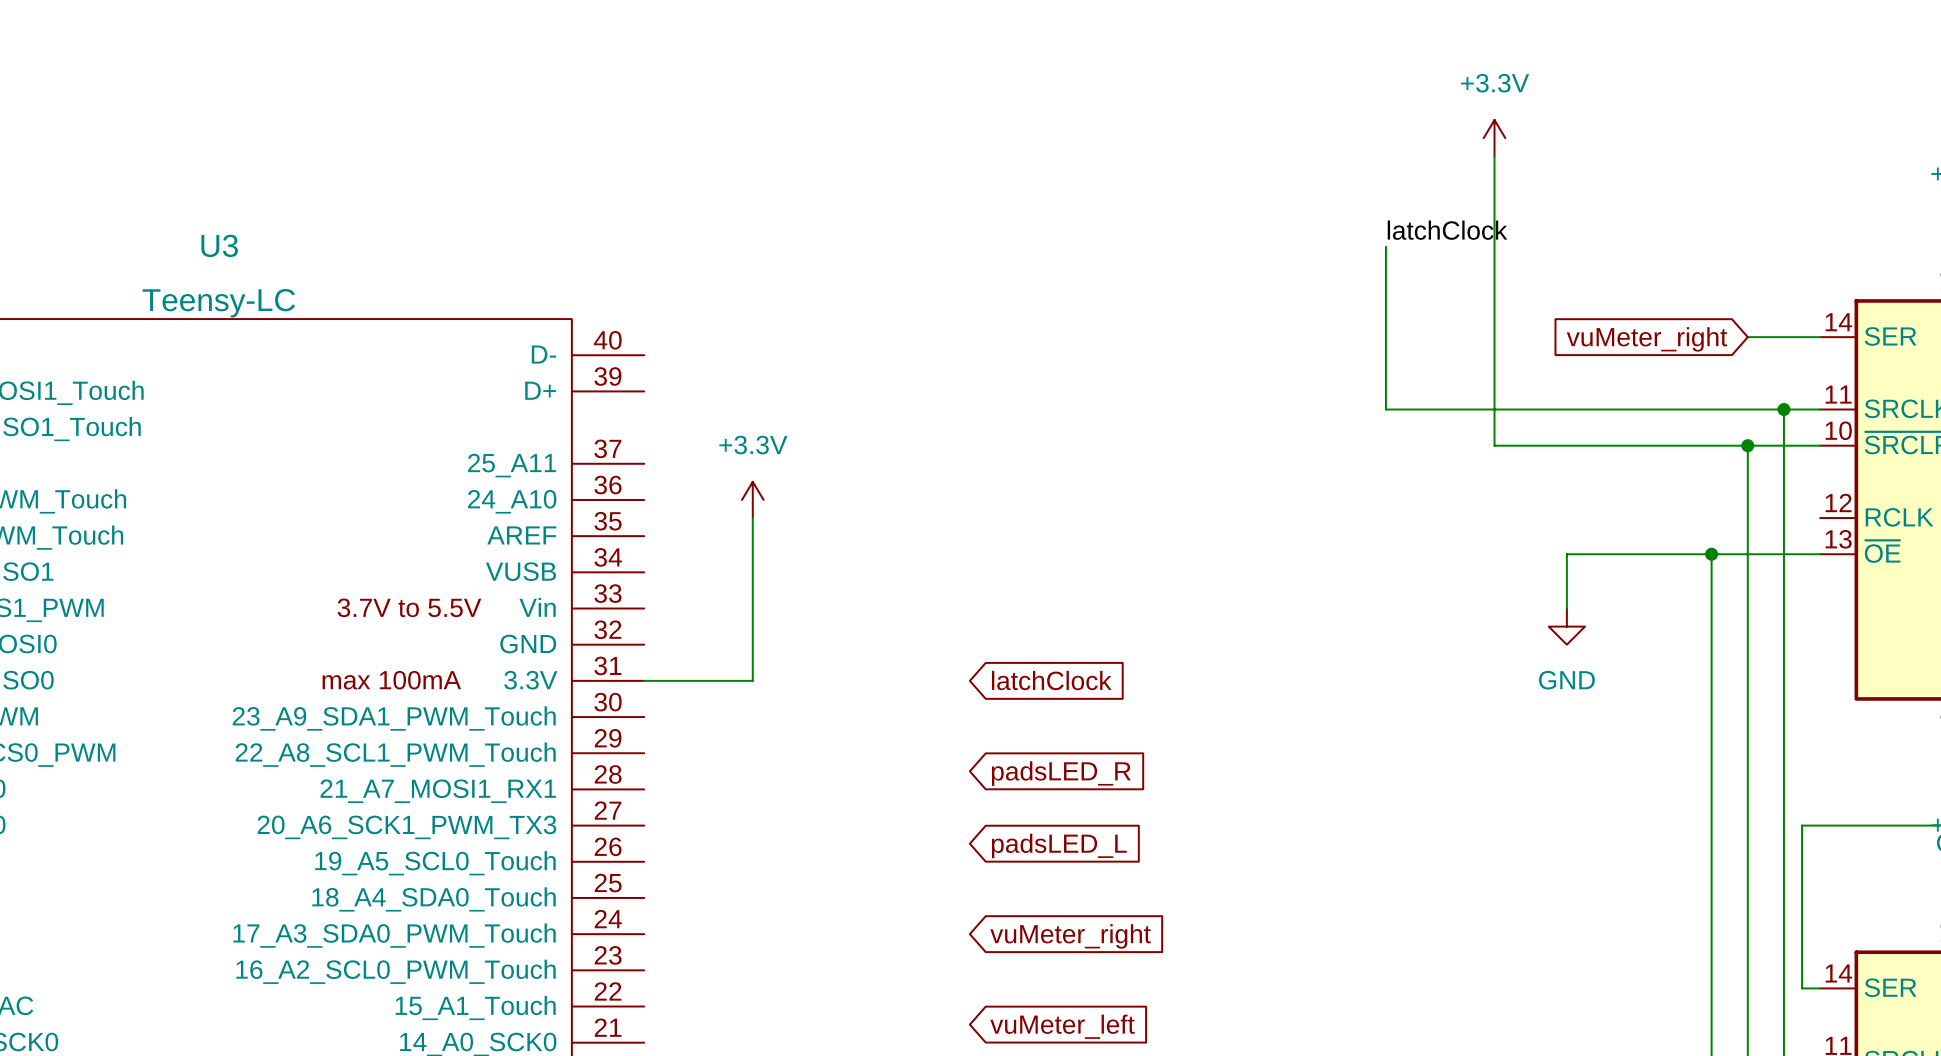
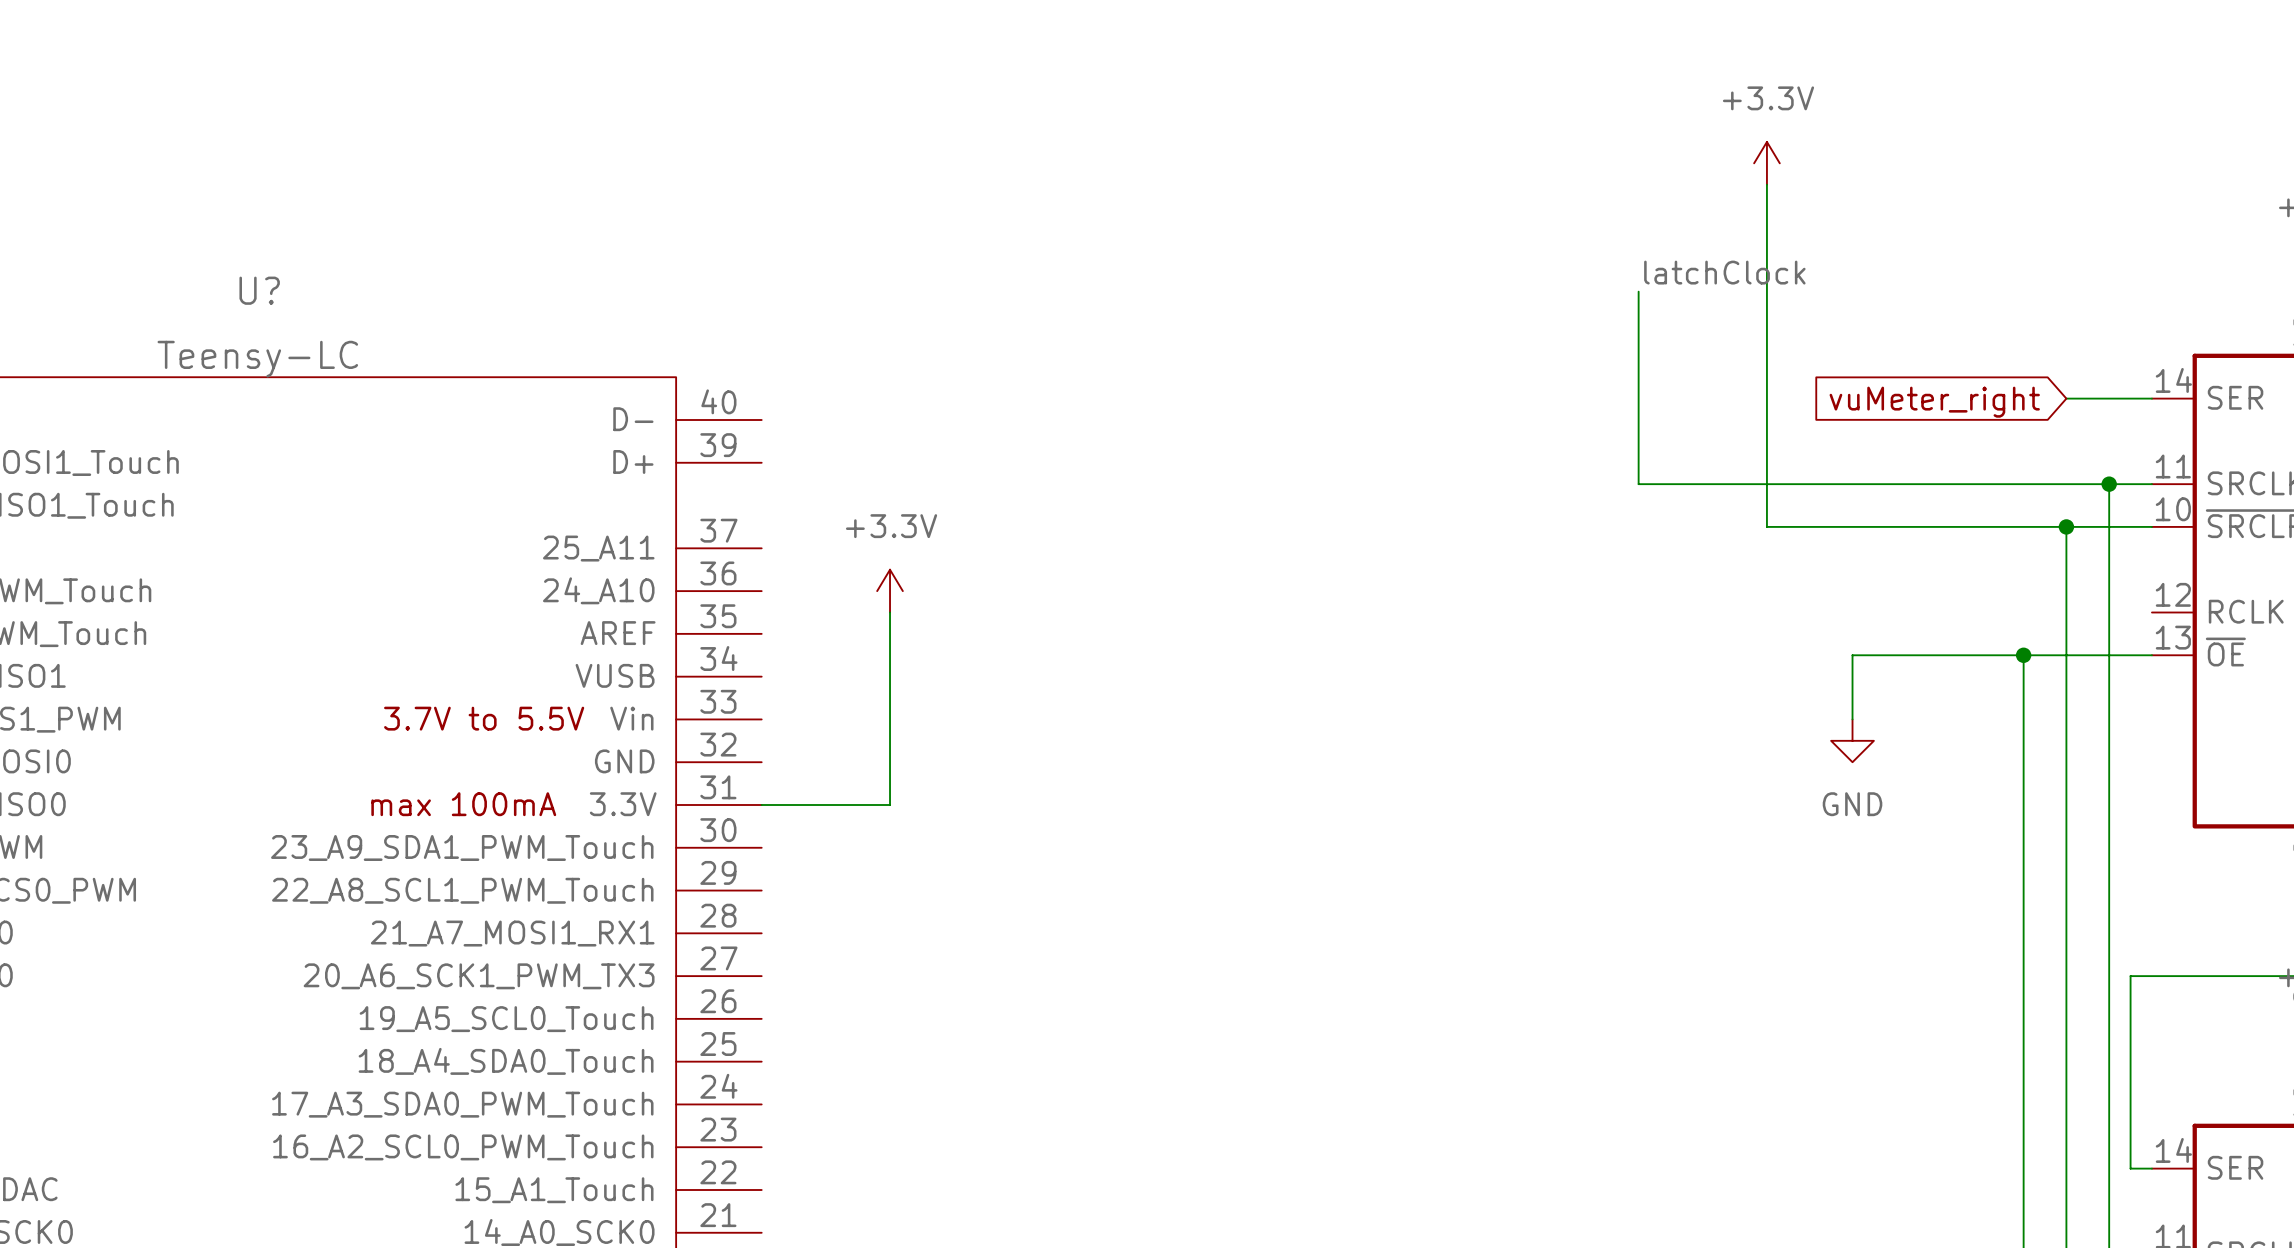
U3 name: U3 (219, 245) -> U? (259, 290)
global label: latchClock (1051, 680) -> none
global label: padsLED_R (1061, 773) -> none
global label: padsLED_L (1059, 845) -> none
global label: vuMeter_right (1070, 936) -> none
global label: vuMeter_left (1062, 1026) -> none

